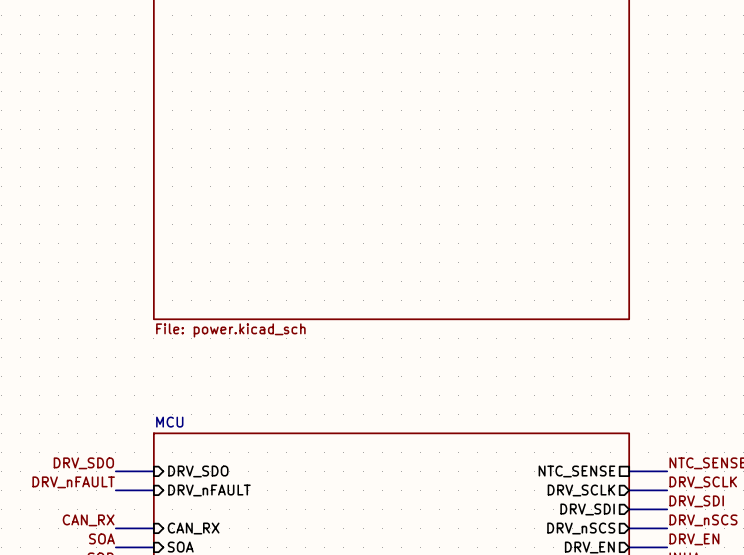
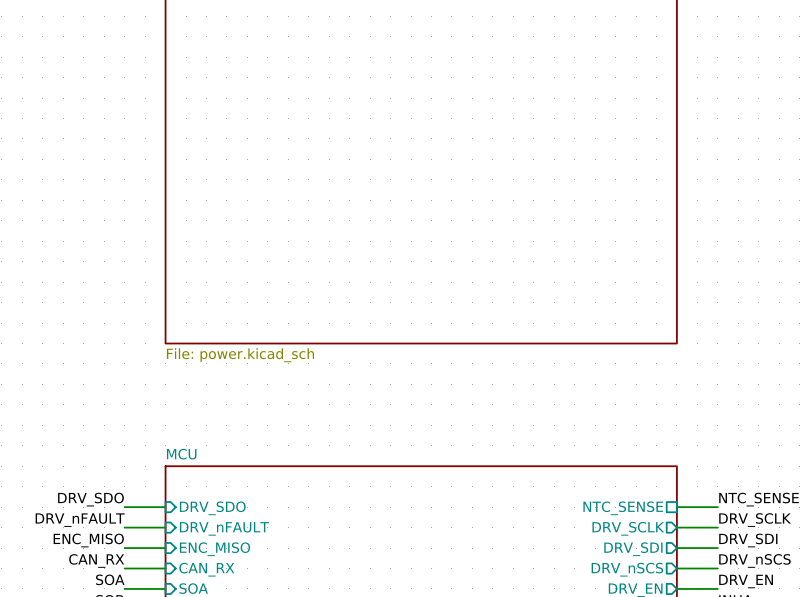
label: none -> ENC_MISO (88, 540)
wire: none -> (124, 548) (165, 548)
sheet pin: none -> ENC_MISO (215, 549)

